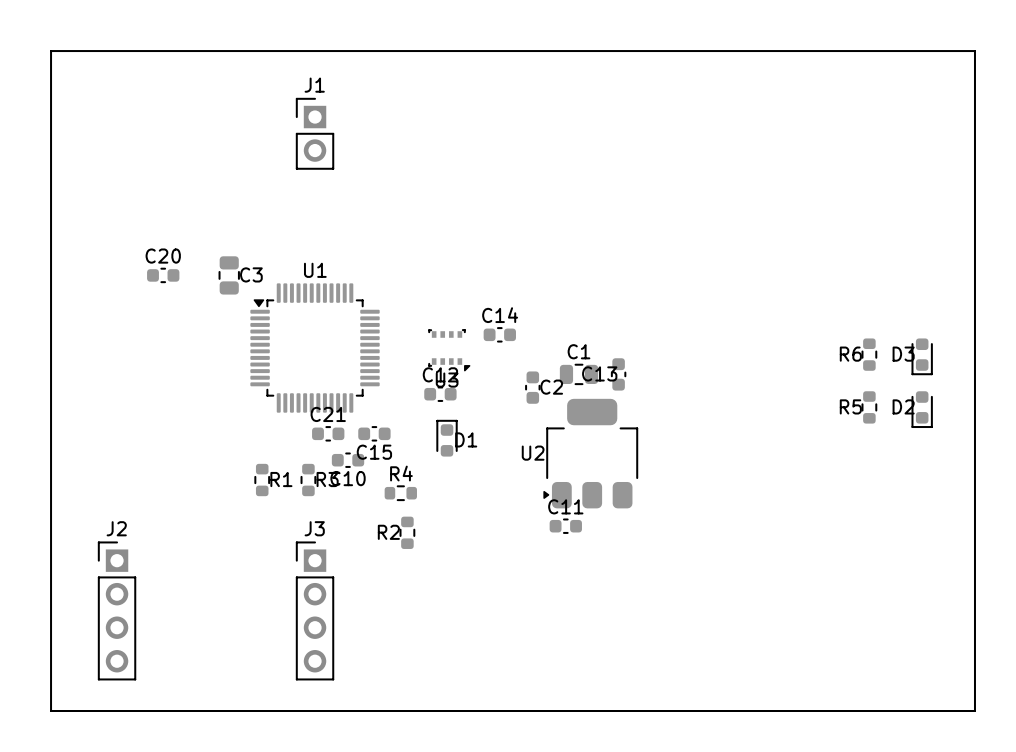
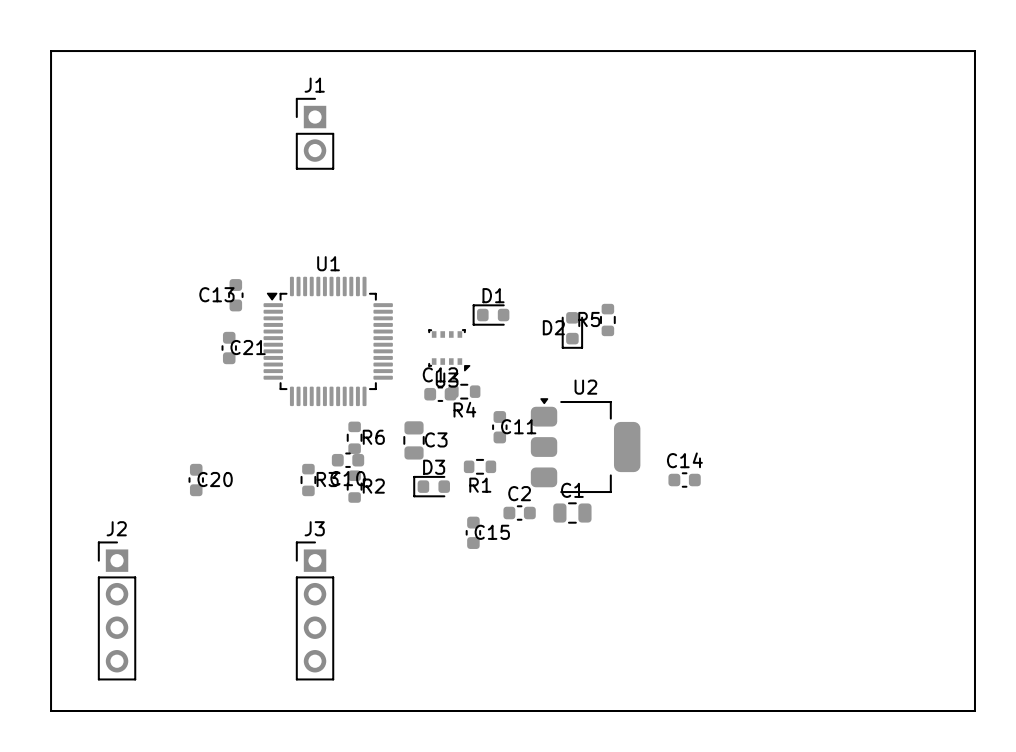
C20 rotation: 0° (163, 275) -> 90° clockwise (196, 480)
C20 position: (163, 275) -> (196, 480)
C3 position: (229, 275) -> (414, 440)
C14 position: (499, 334) -> (684, 480)
U1 position: (315, 348) -> (328, 341)
R6 name position: R6 (850, 354) -> R6 (373, 437)
R6 position: (869, 354) -> (354, 437)
D3 rotation: 0° (922, 356) -> 90° clockwise (431, 486)
D3 position: (922, 356) -> (431, 486)
C1 position: (579, 374) -> (572, 513)
C13 position: (618, 374) -> (235, 295)
C2 rotation: 0° (532, 387) -> 90° clockwise (519, 513)
C2 position: (532, 387) -> (519, 513)
C2 name position: C2 (551, 387) -> C2 (519, 493)
R5 position: (869, 407) -> (607, 319)
D2 position: (922, 409) -> (572, 330)
C21 rotation: 0° (328, 433) -> 90° clockwise (229, 348)
C21 position: (328, 433) -> (229, 348)
C15 rotation: 0° (374, 433) -> 90° clockwise (473, 532)
C15 position: (374, 433) -> (473, 532)
D1 rotation: 0° (447, 438) -> 90° counterclockwise (491, 315)
D1 position: (447, 438) -> (491, 315)
C15 name position: C15 (374, 452) -> C15 (492, 532)
U2 rotation: 0° (590, 453) -> 90° clockwise (585, 445)
R4 name position: R4 (401, 473) -> R4 (464, 409)
R1 rotation: 0° (262, 480) -> 90° clockwise (480, 466)
R1 position: (262, 480) -> (480, 466)
R4 position: (400, 493) -> (464, 391)
C11 rotation: 0° (565, 526) -> 90° clockwise (499, 427)
C11 position: (565, 526) -> (499, 427)
R2 name position: R2 (388, 532) -> R2 (373, 486)
R2 position: (407, 532) -> (354, 486)

